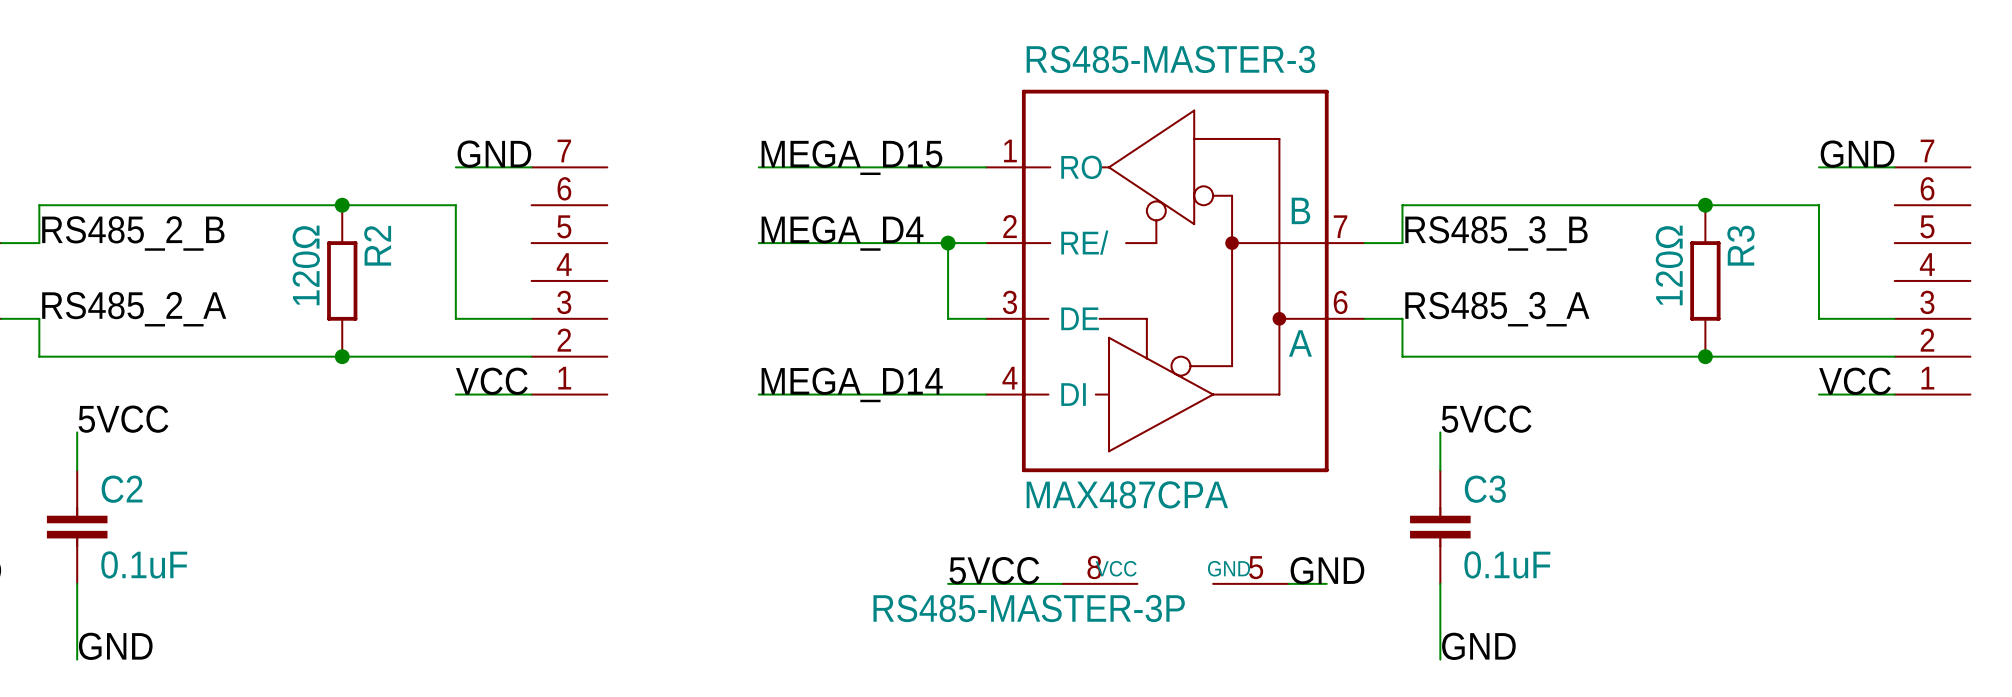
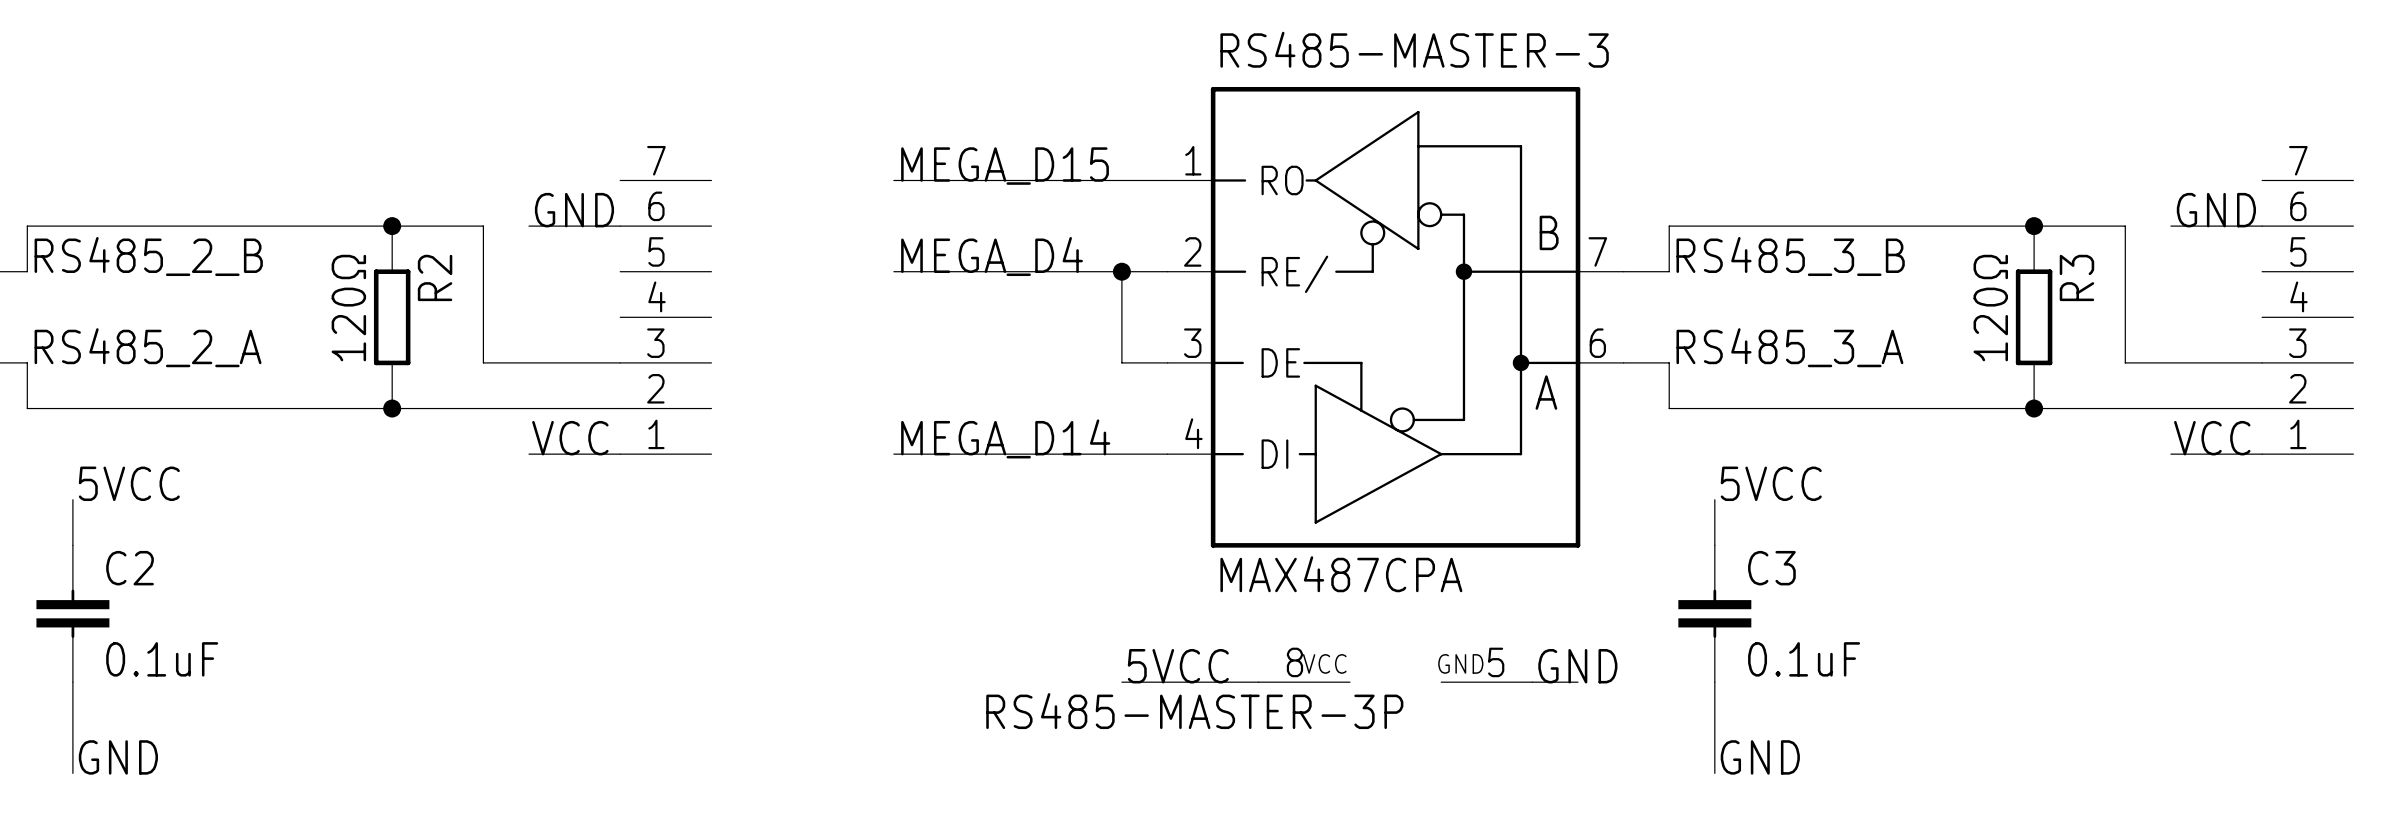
label position: GND (494, 154) -> GND (574, 210)
label position: GND (1857, 154) -> GND (2216, 210)
wire: (455, 167) (531, 167) -> (529, 226) (620, 226)
wire: (1818, 167) (1894, 167) -> (2170, 226) (2262, 226)
wire: (417, 205) (455, 205) (455, 318) -> (483, 226) (483, 362) (529, 362)
wire: (1781, 205) (1818, 205) (1818, 318) -> (2125, 226) (2125, 362) (2170, 362)

